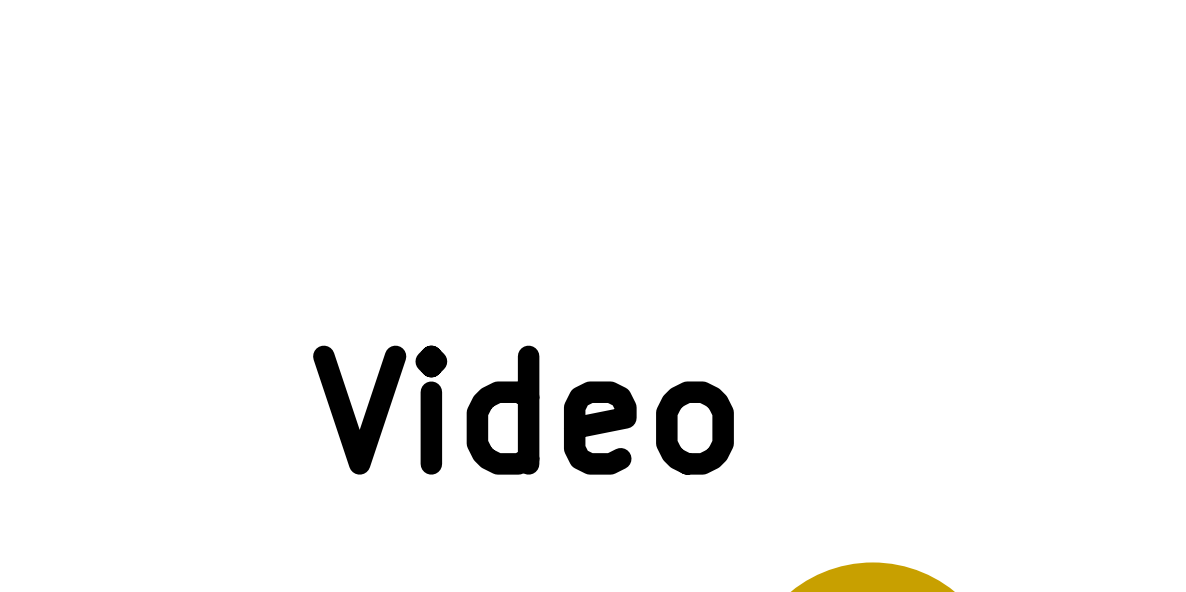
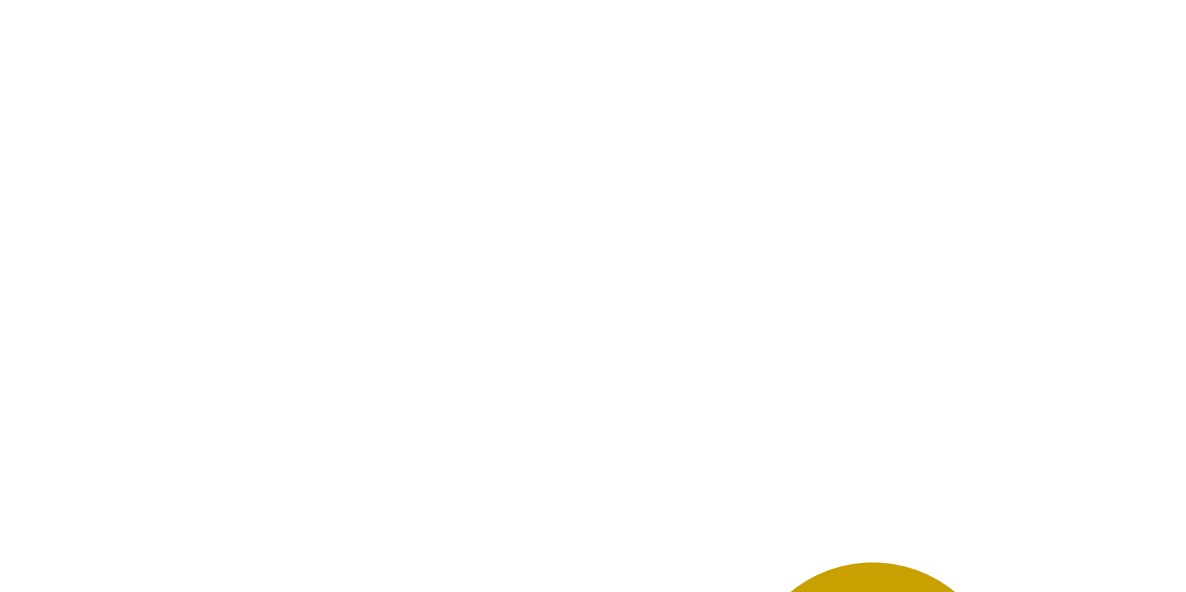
text: Video (523, 410) -> none

